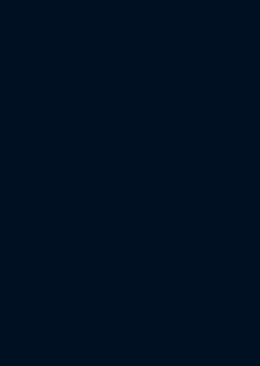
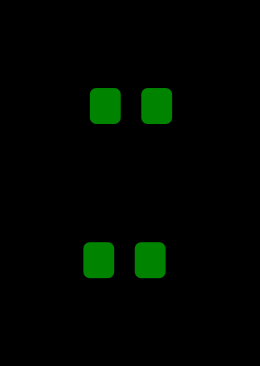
part: none -> (131, 106)
part: none -> (124, 260)

